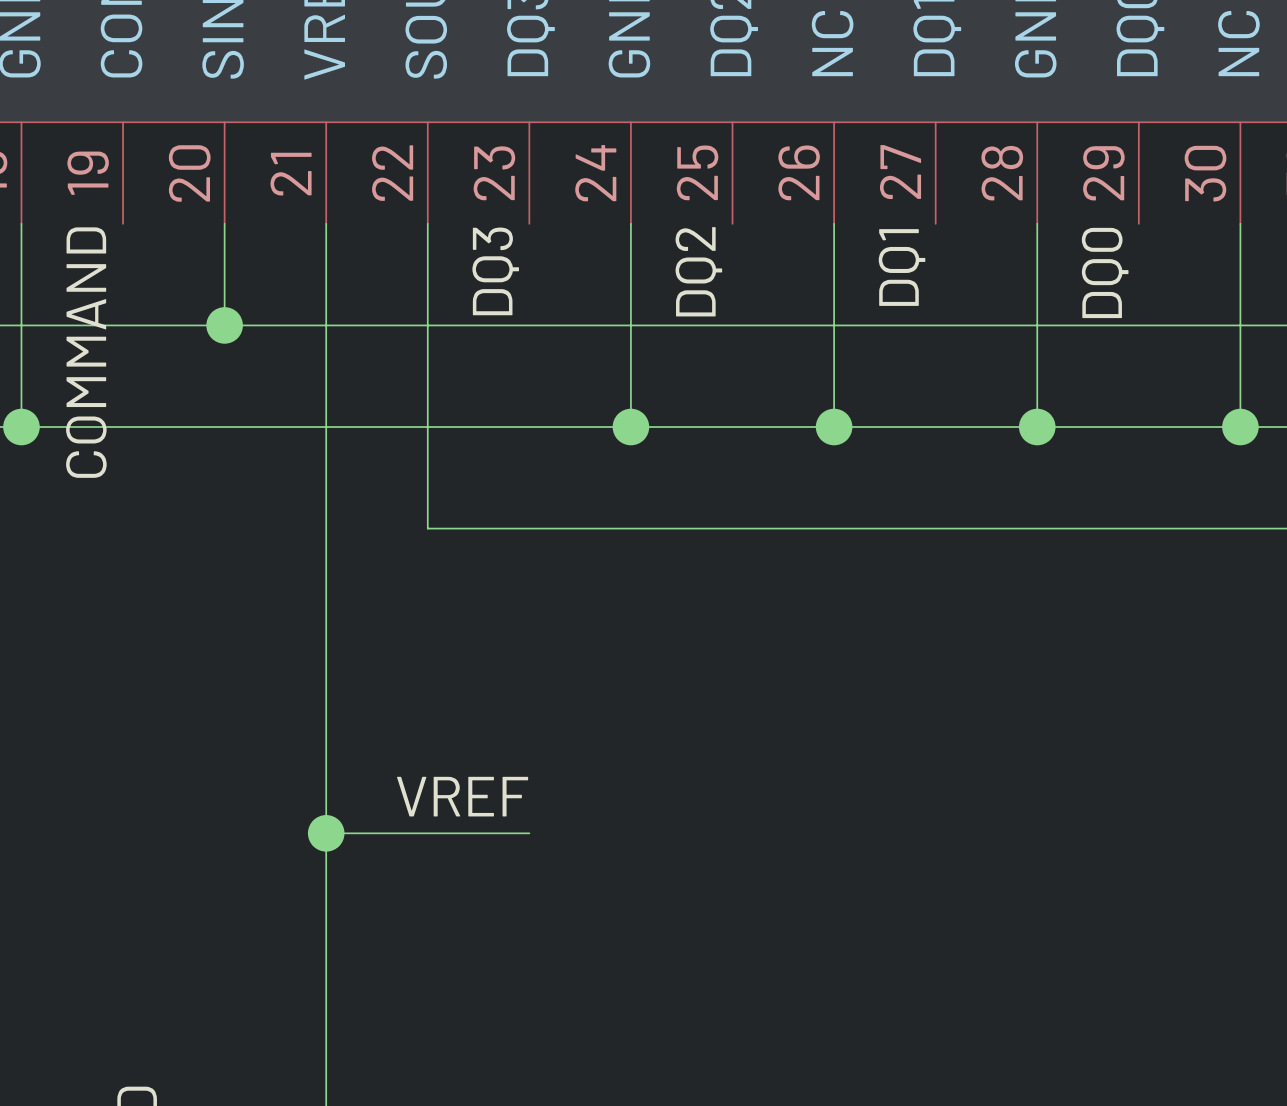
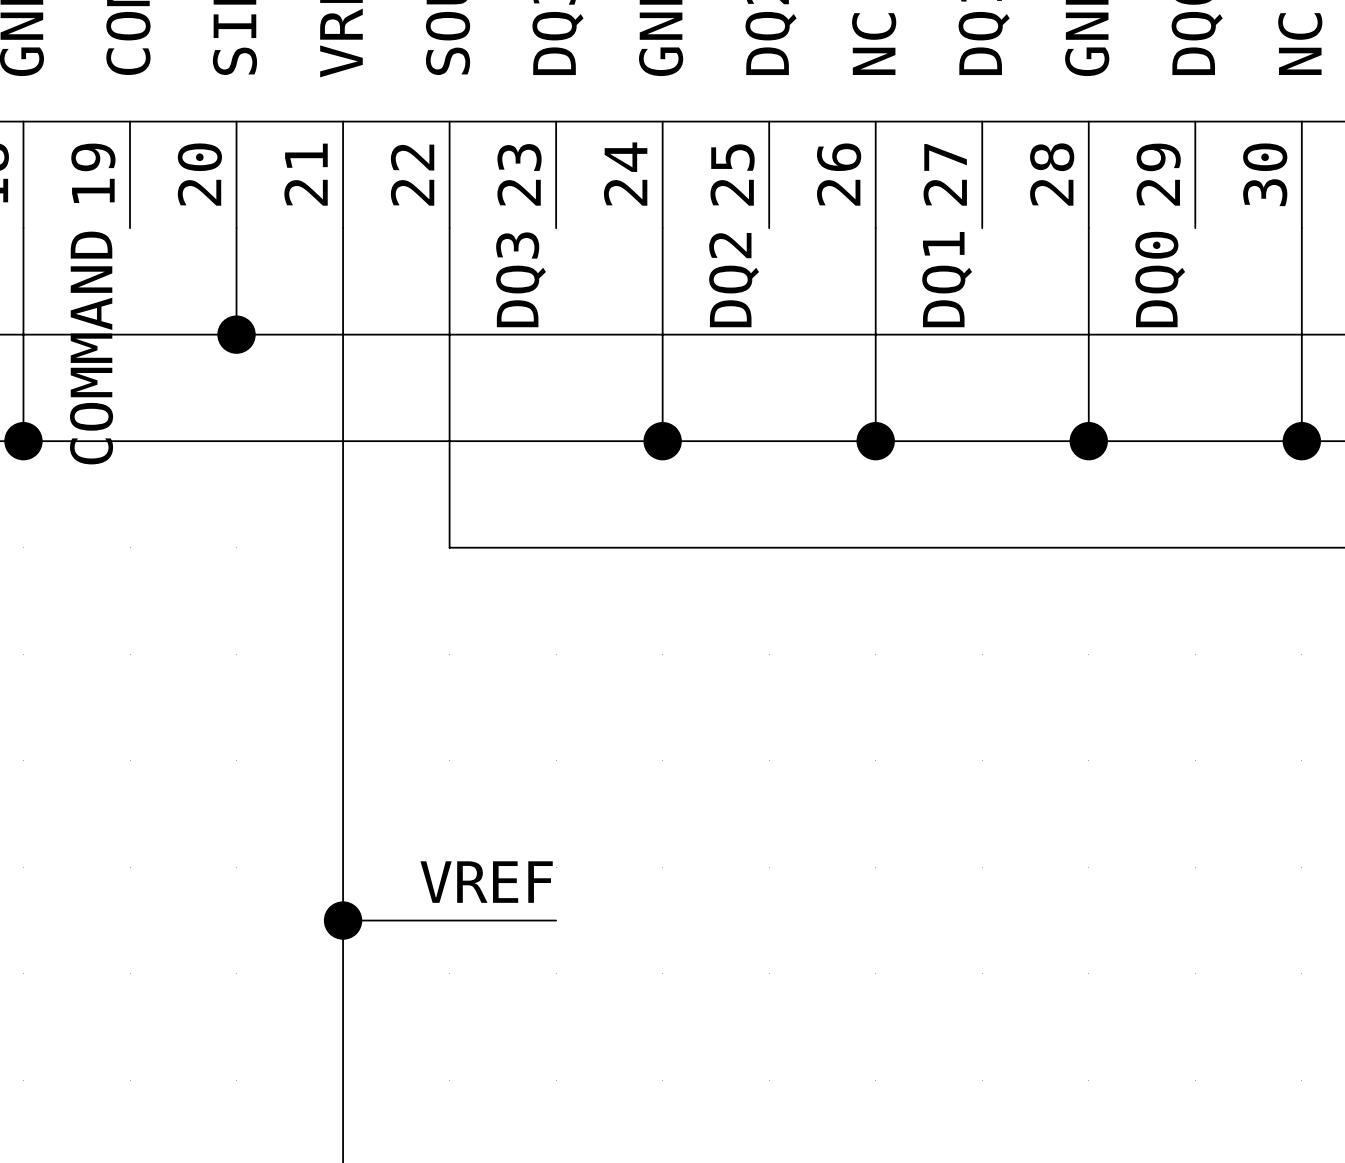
label position: VREF (462, 796) -> VREF (486, 882)
wire: (326, 833) (529, 833) -> (343, 920) (556, 920)
junction position: (326, 833) -> (343, 920)

